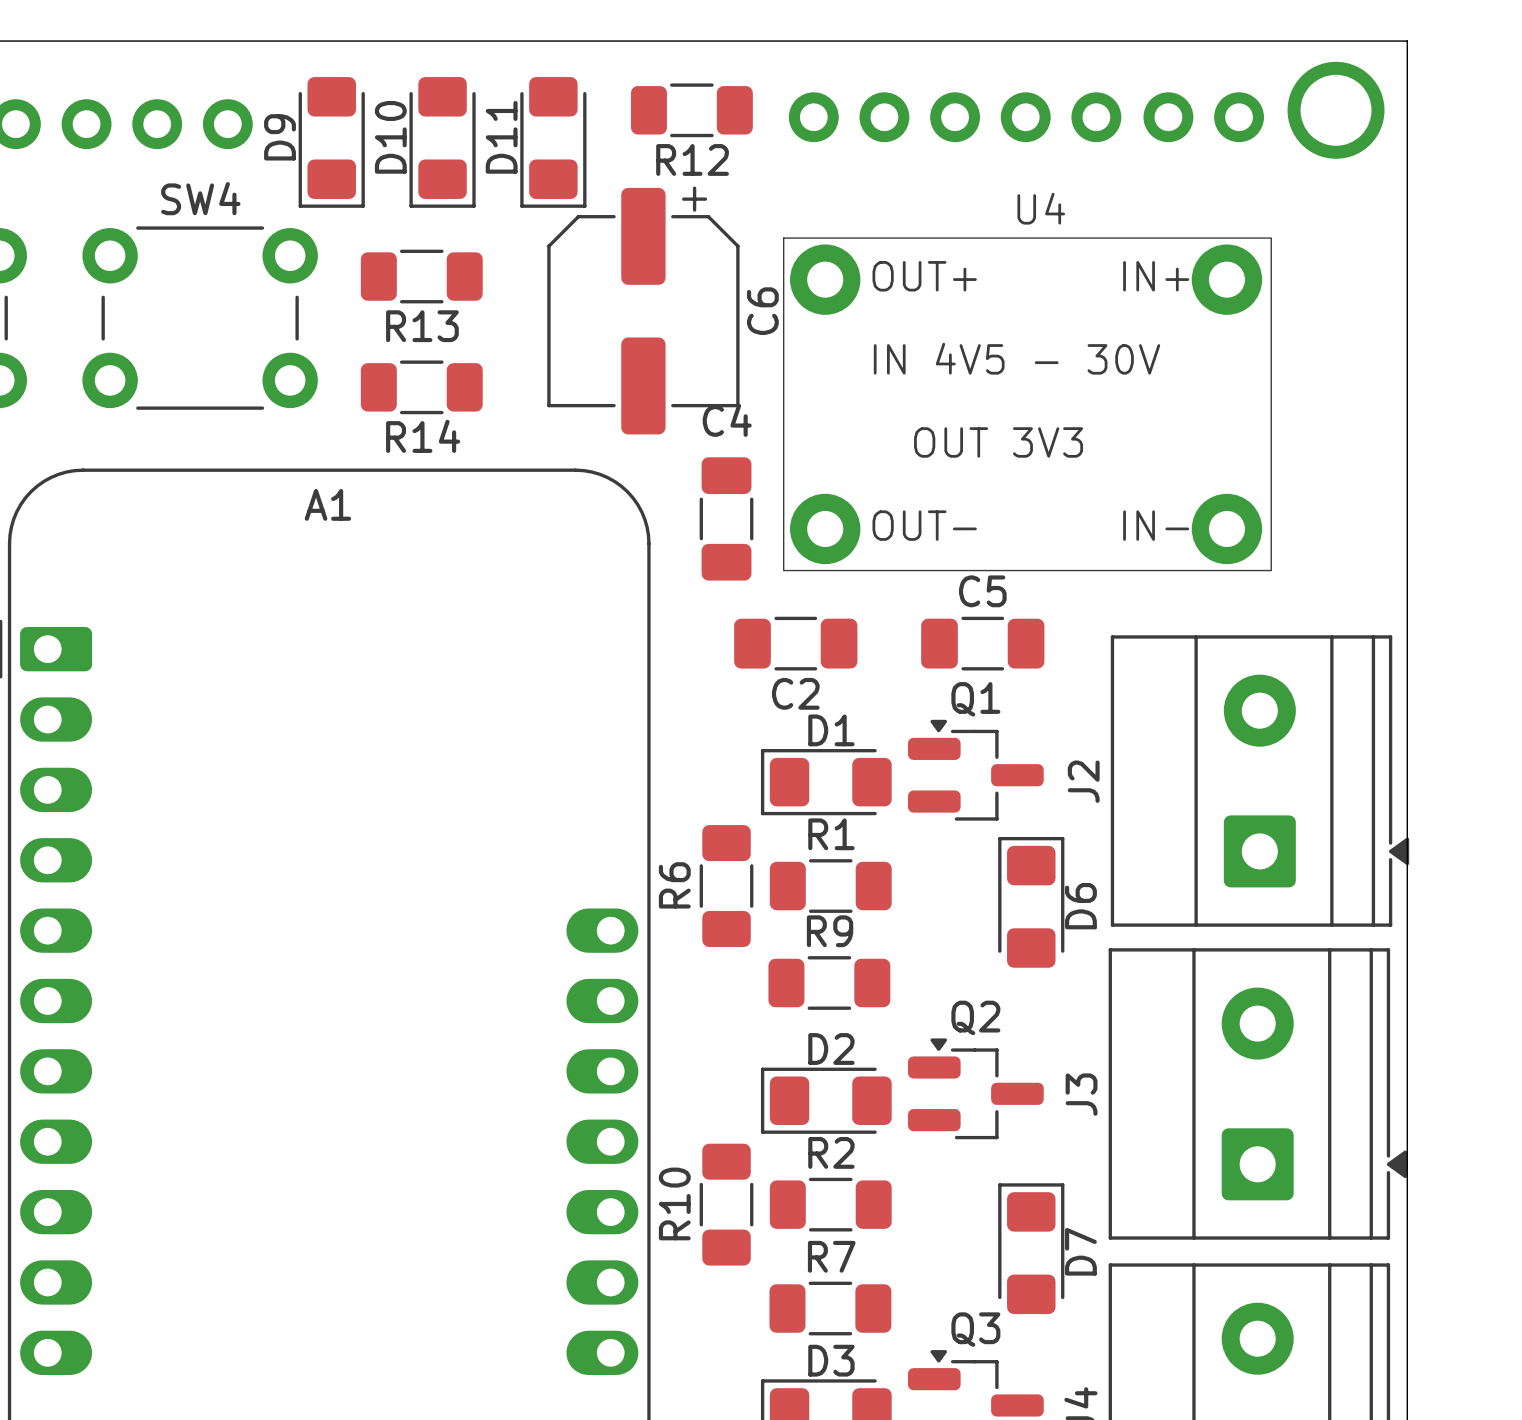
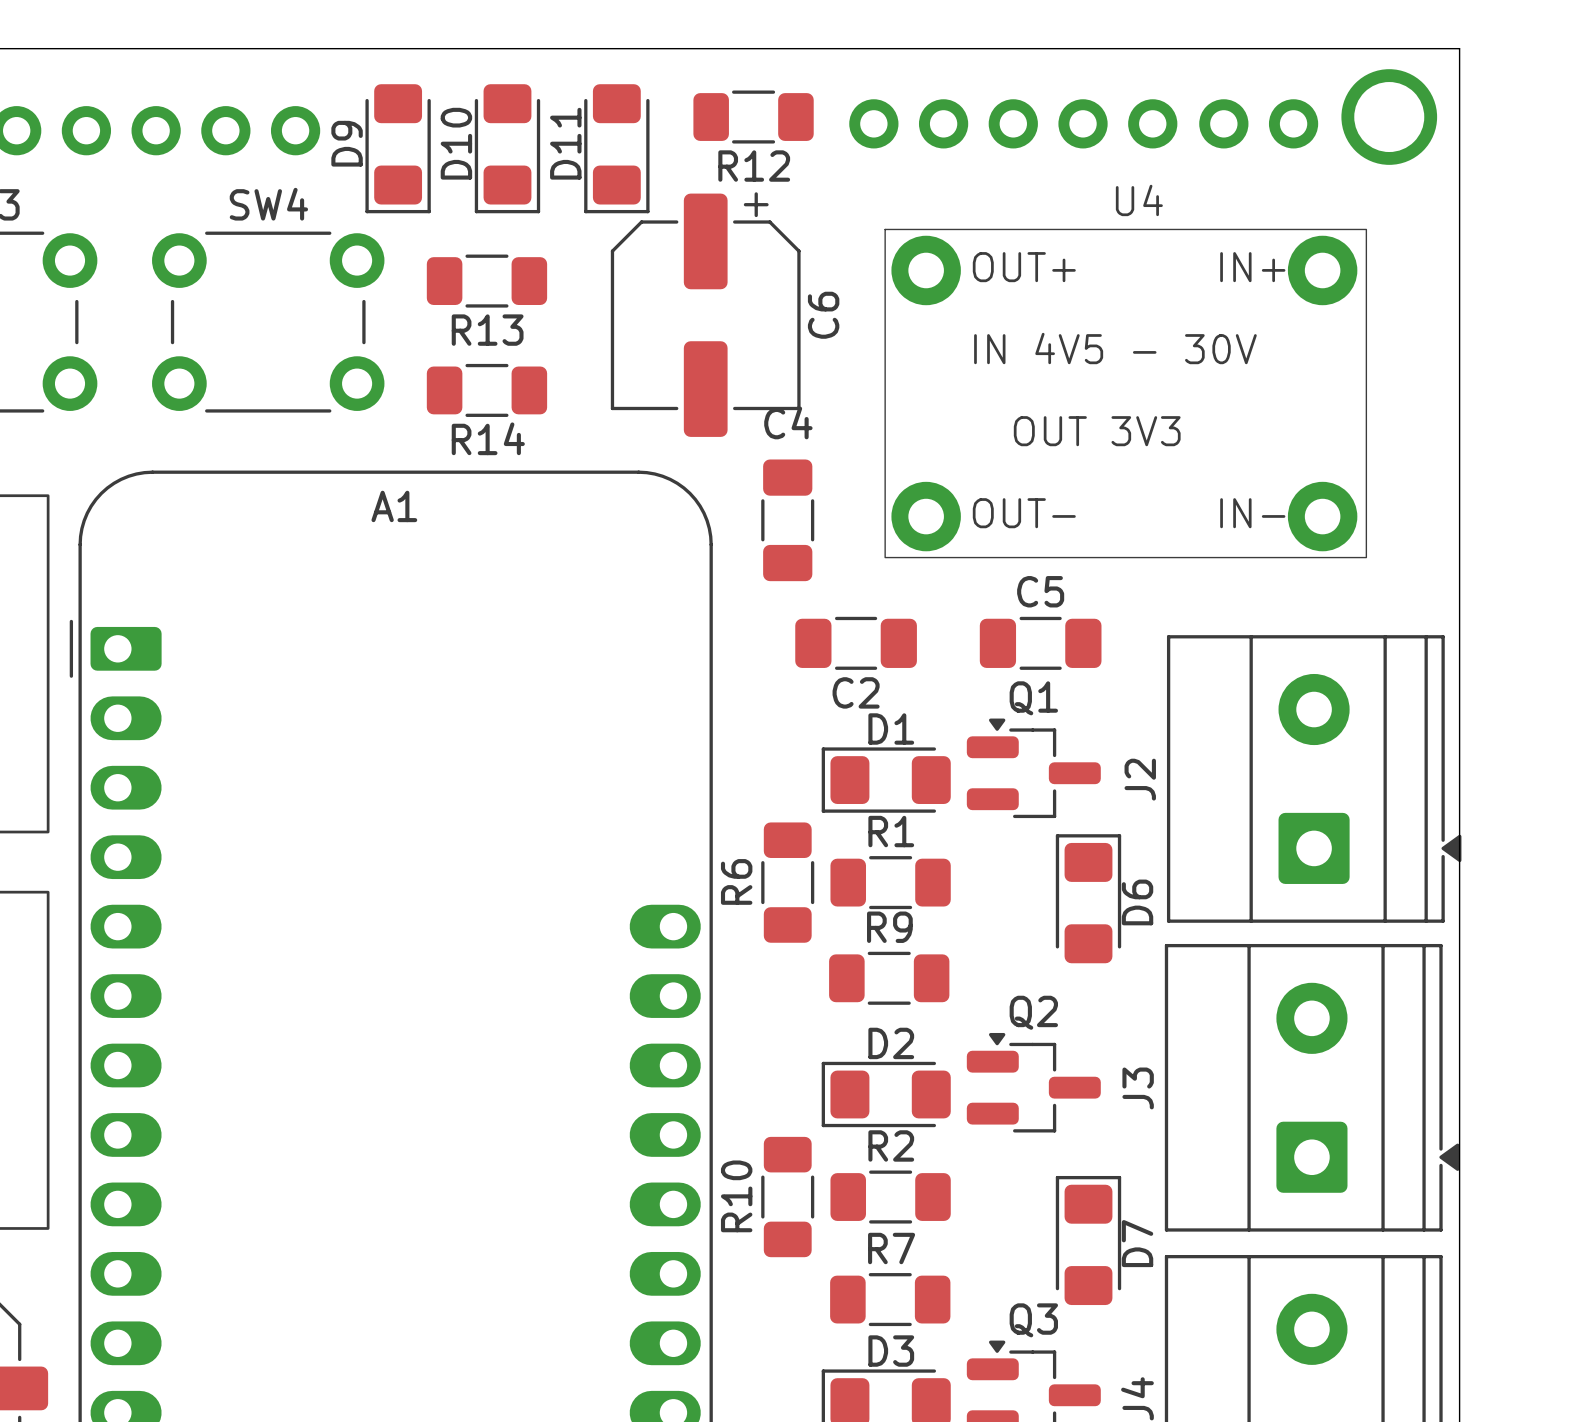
U4 position: (1027, 404) -> (1125, 393)

